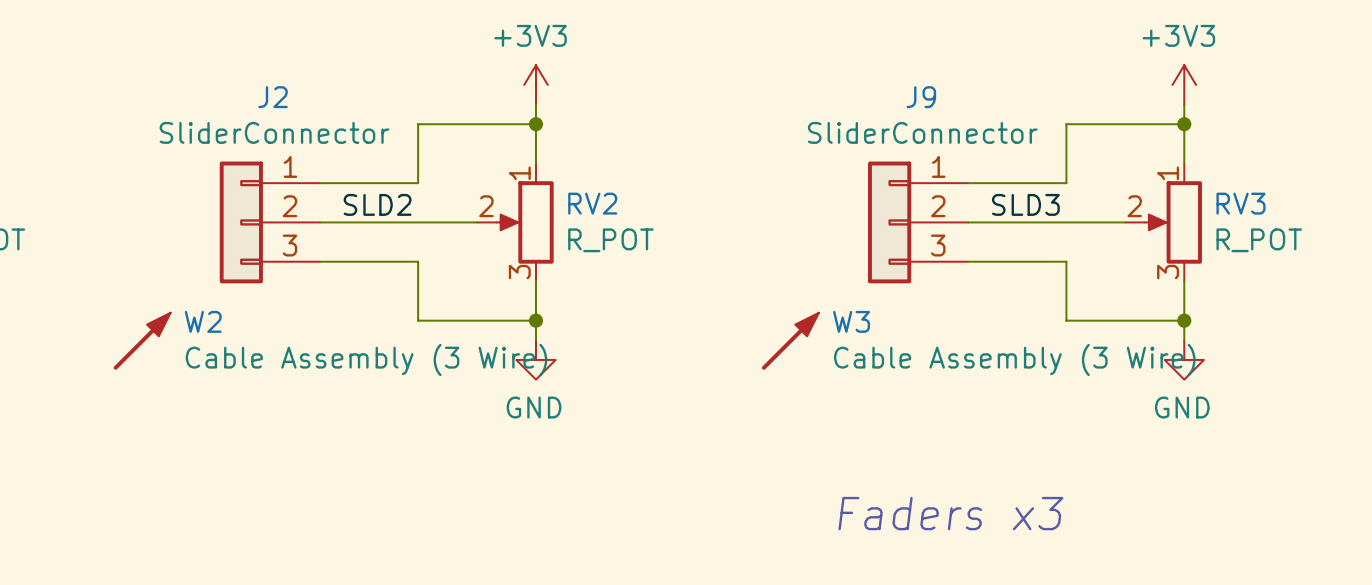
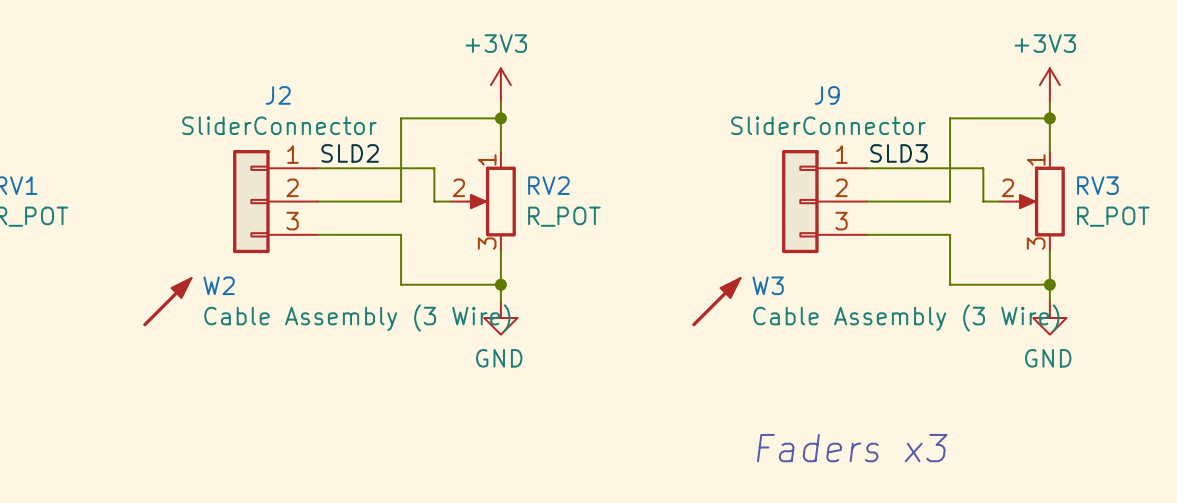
label position: SLD2 (377, 204) -> SLD2 (350, 153)
label position: SLD3 (1025, 204) -> SLD3 (899, 153)
wire: (418, 222) (457, 222) -> (401, 201) (401, 168) (434, 168) (434, 201)
wire: (1066, 222) (1105, 222) -> (950, 201) (950, 168) (983, 168) (983, 201)

